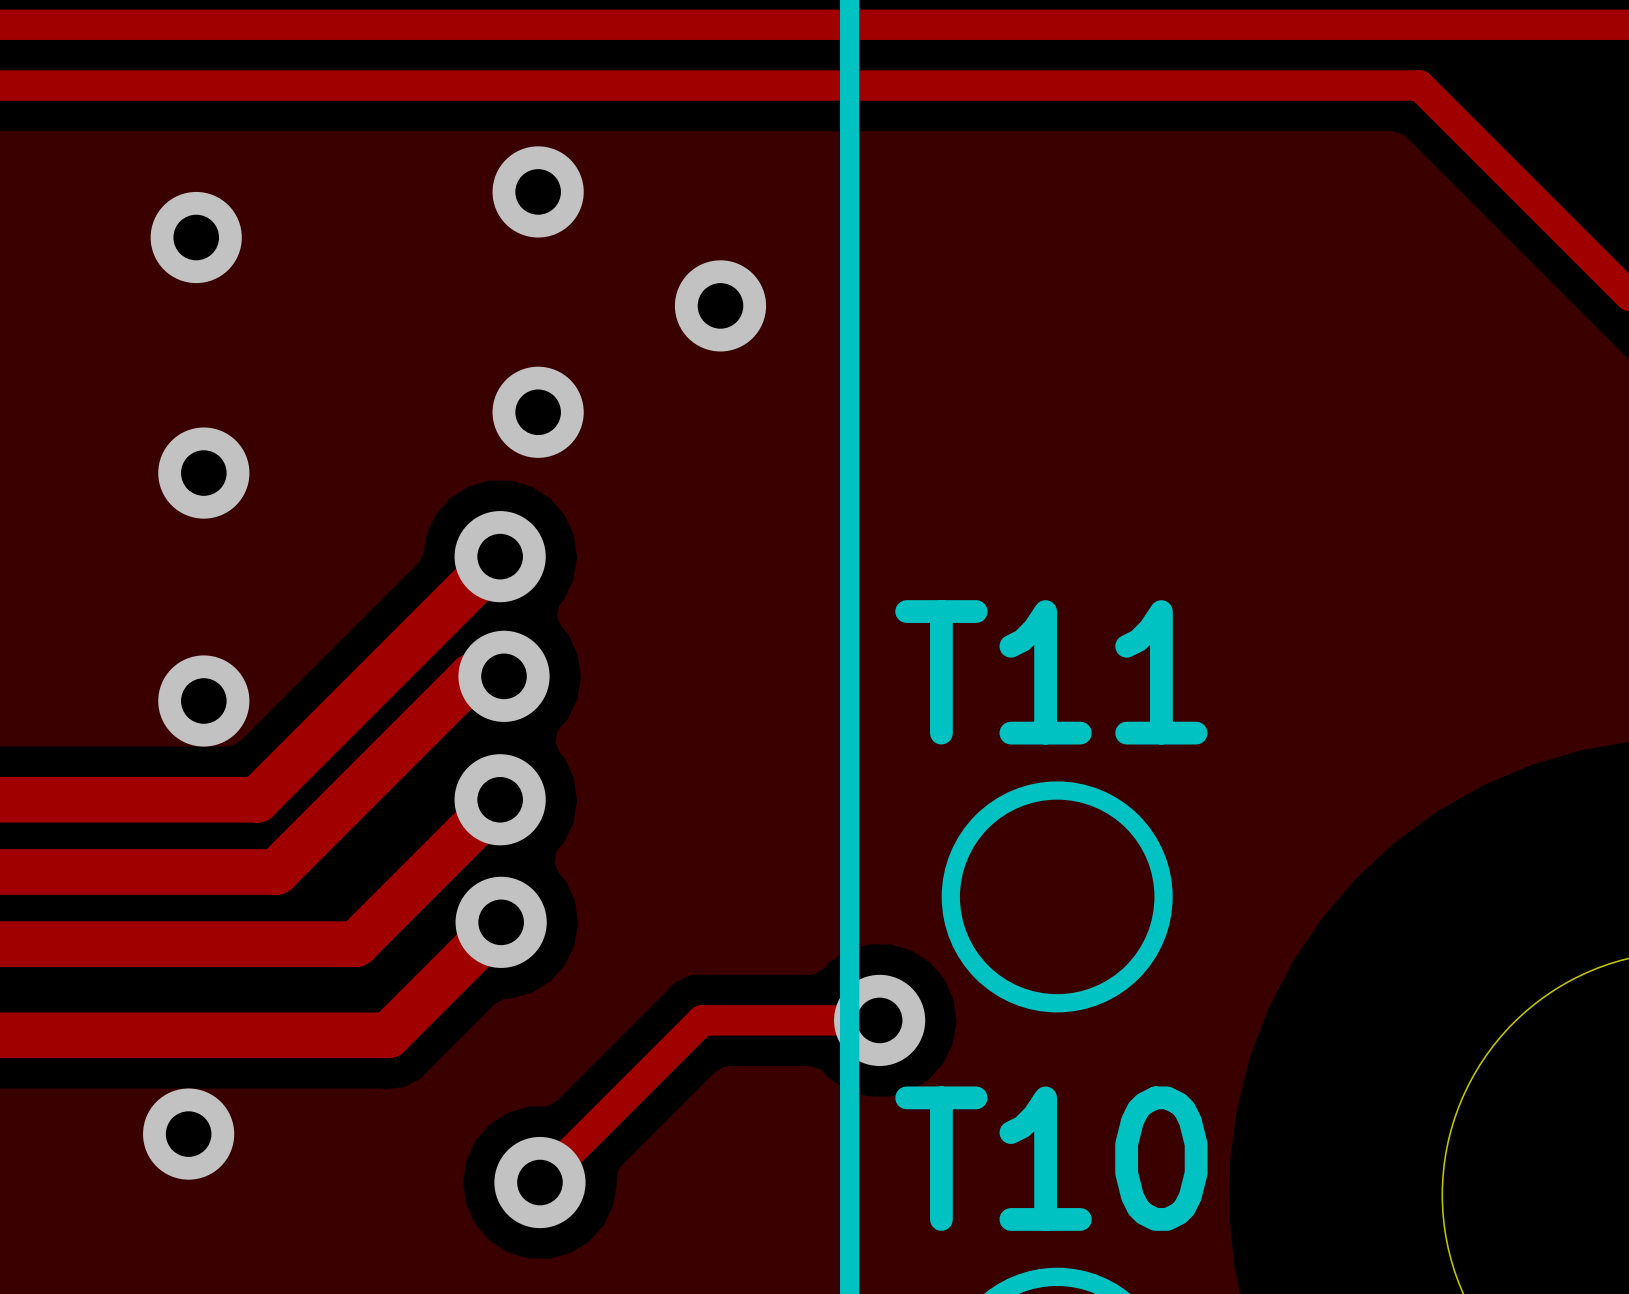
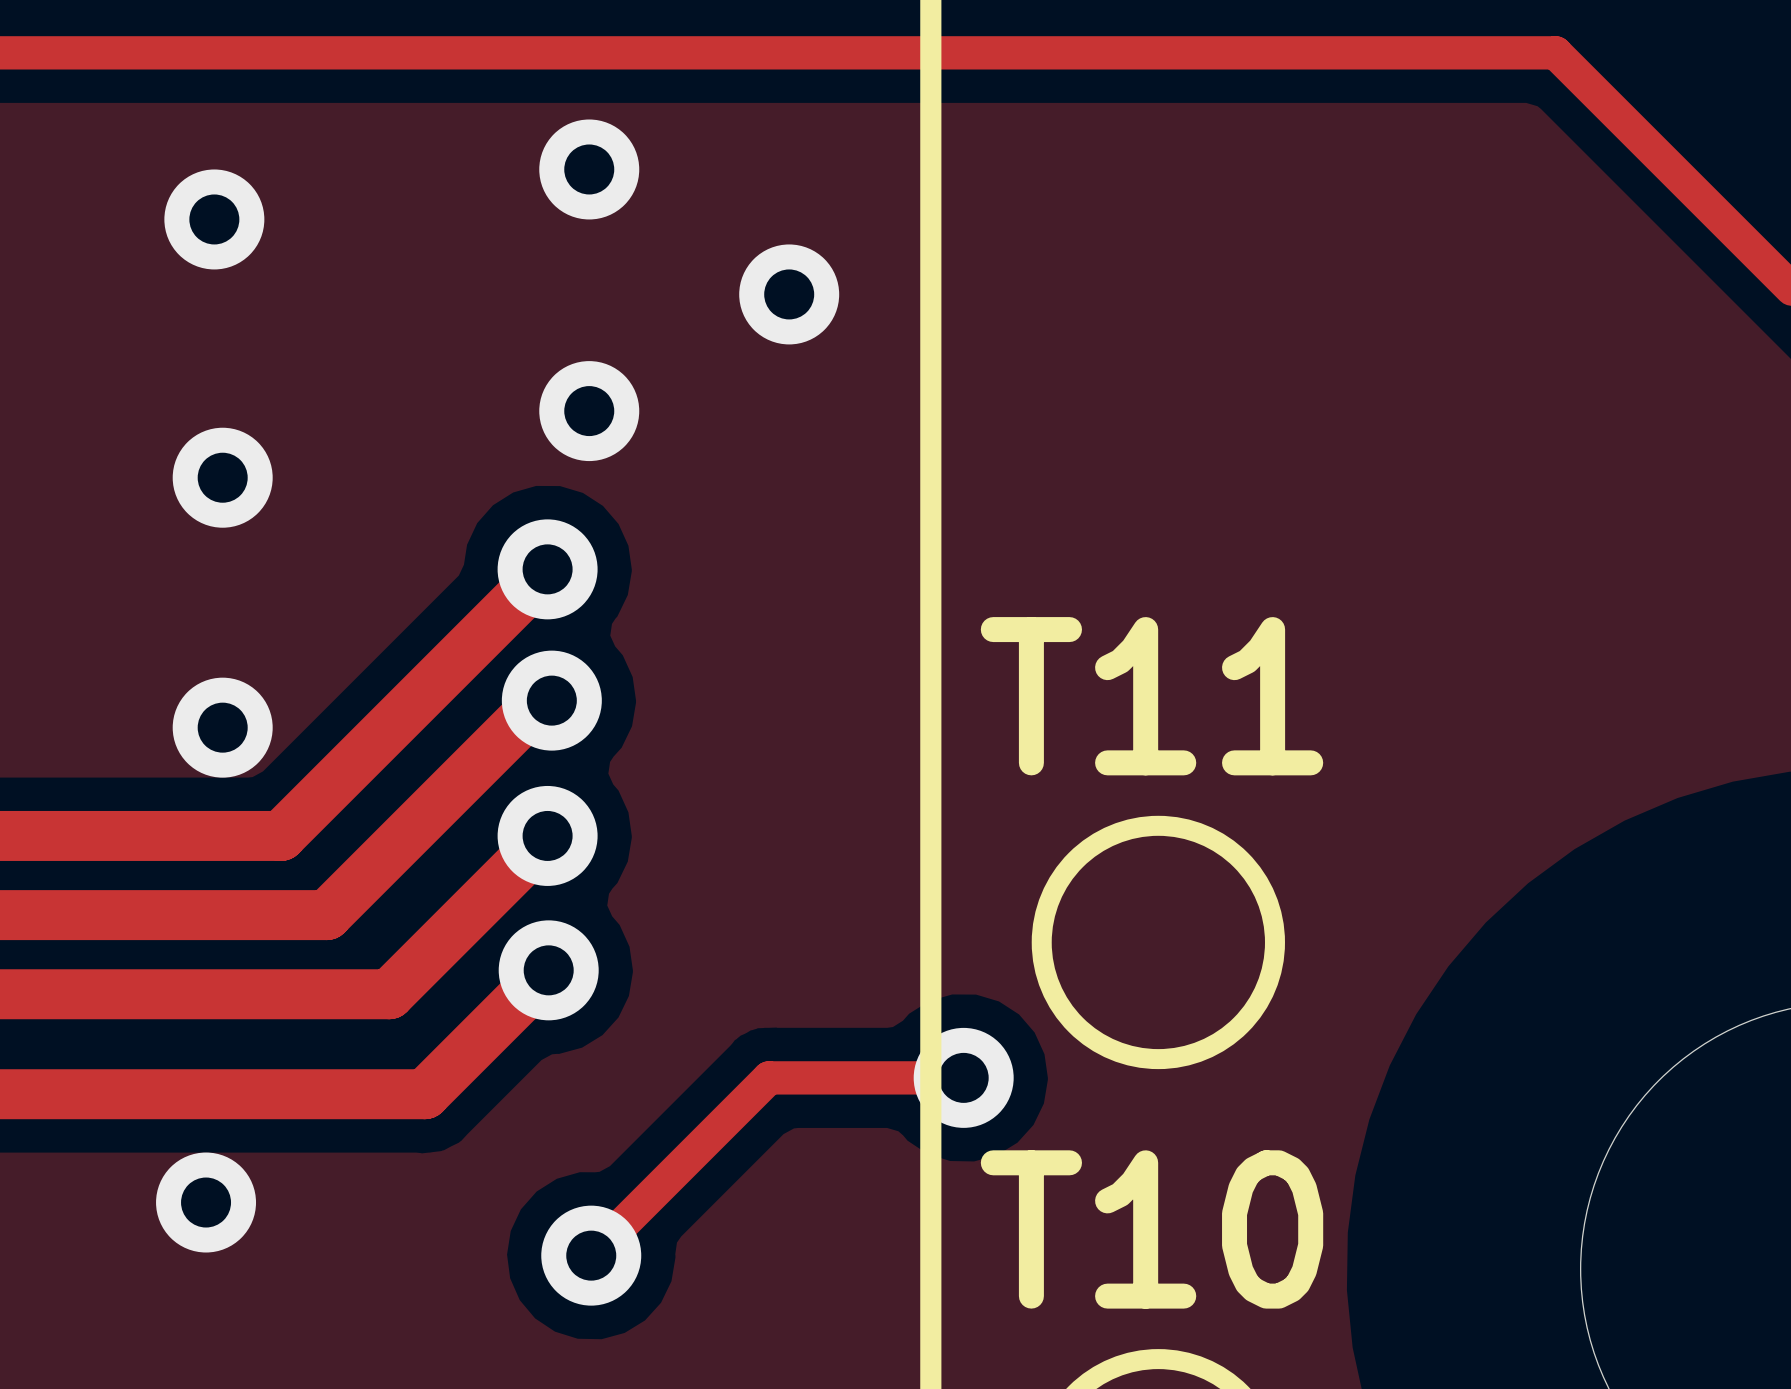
track: (494, 676) (471, 676) (276, 871) -> (541, 700) (326, 915) (302, 915)

